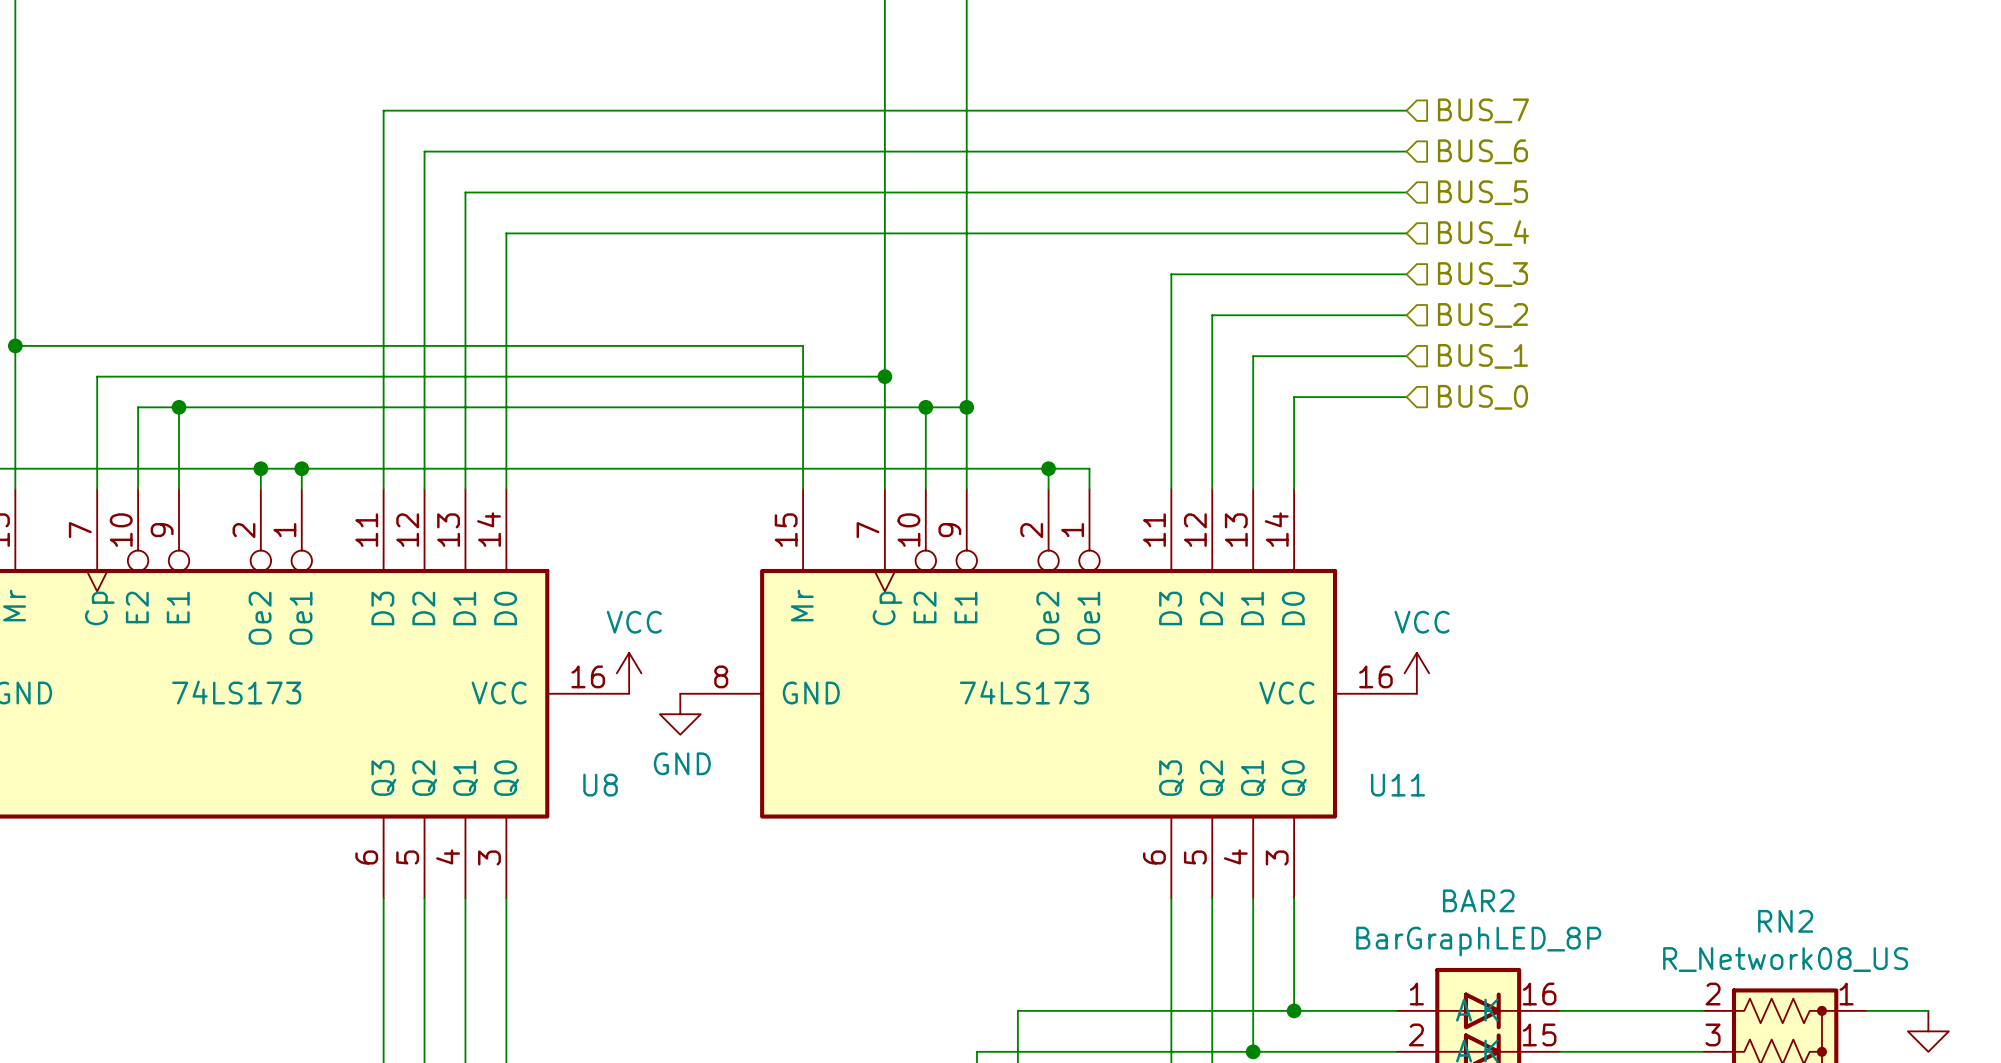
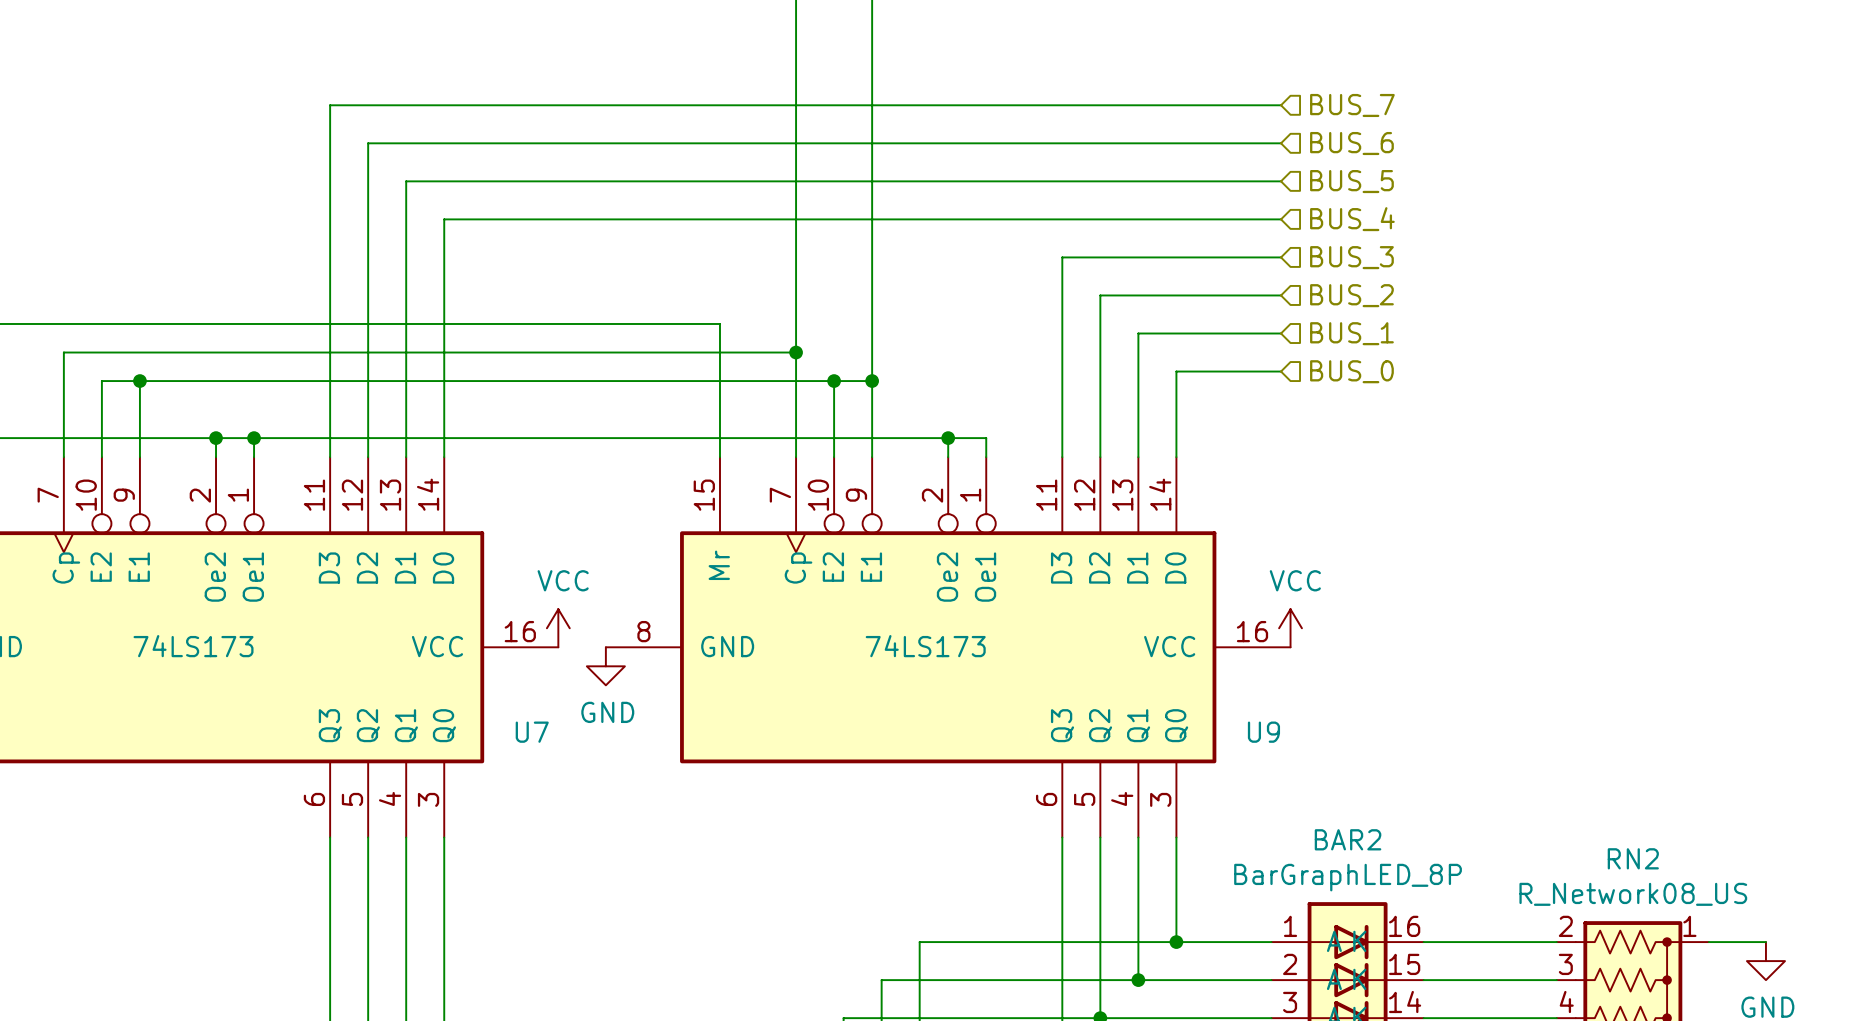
U8 name: U8 (600, 785) -> U7 (532, 732)
U11 name: U11 (1398, 785) -> U9 (1263, 732)

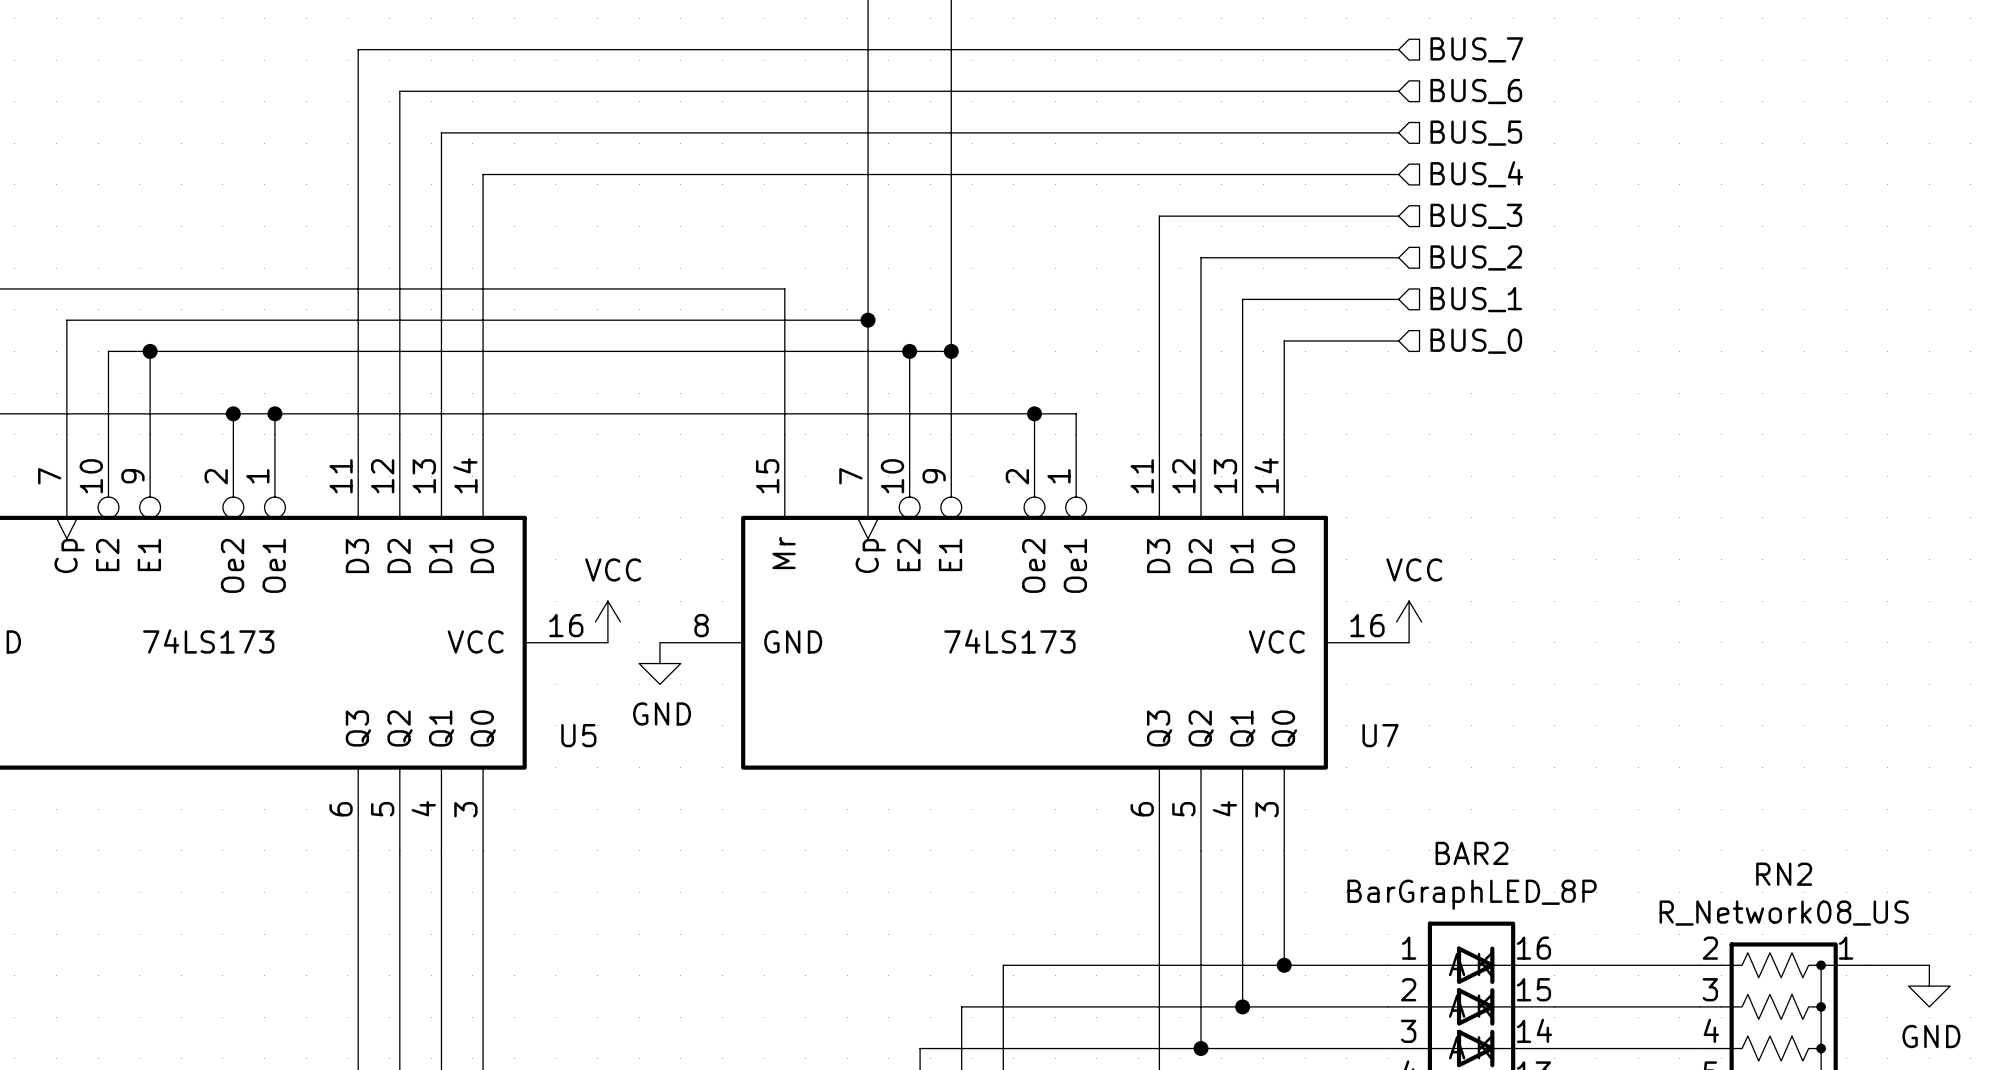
U7 name: U7 (532, 732) -> U5 (578, 735)
U9 name: U9 (1263, 732) -> U7 (1380, 735)

